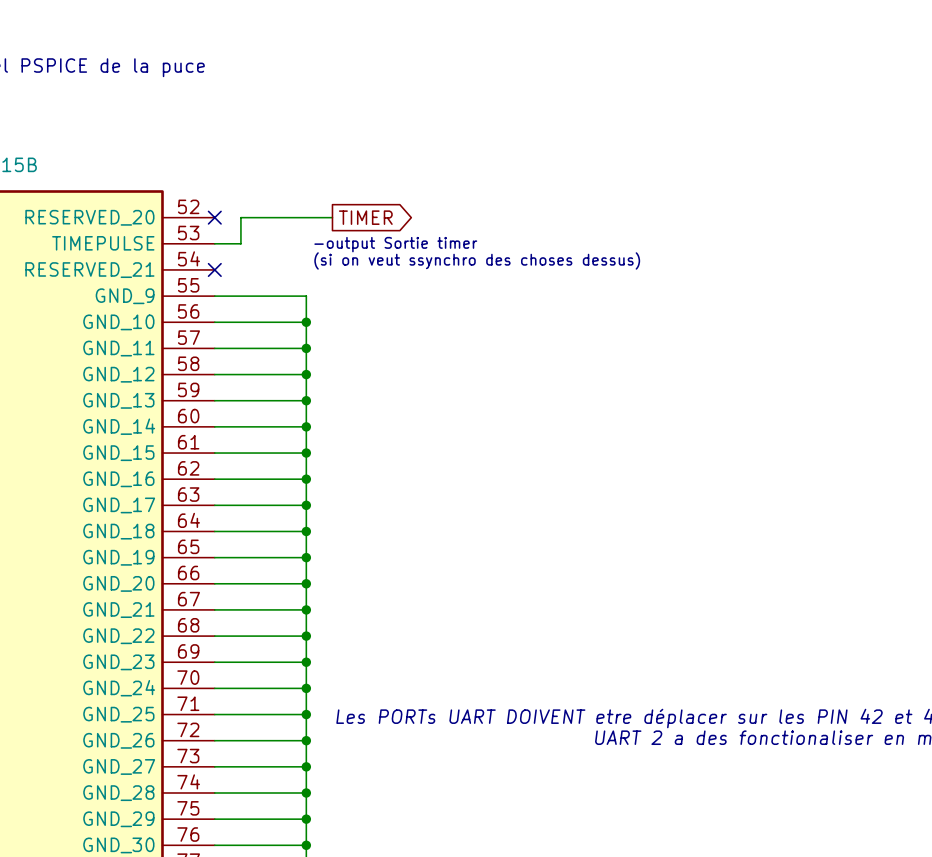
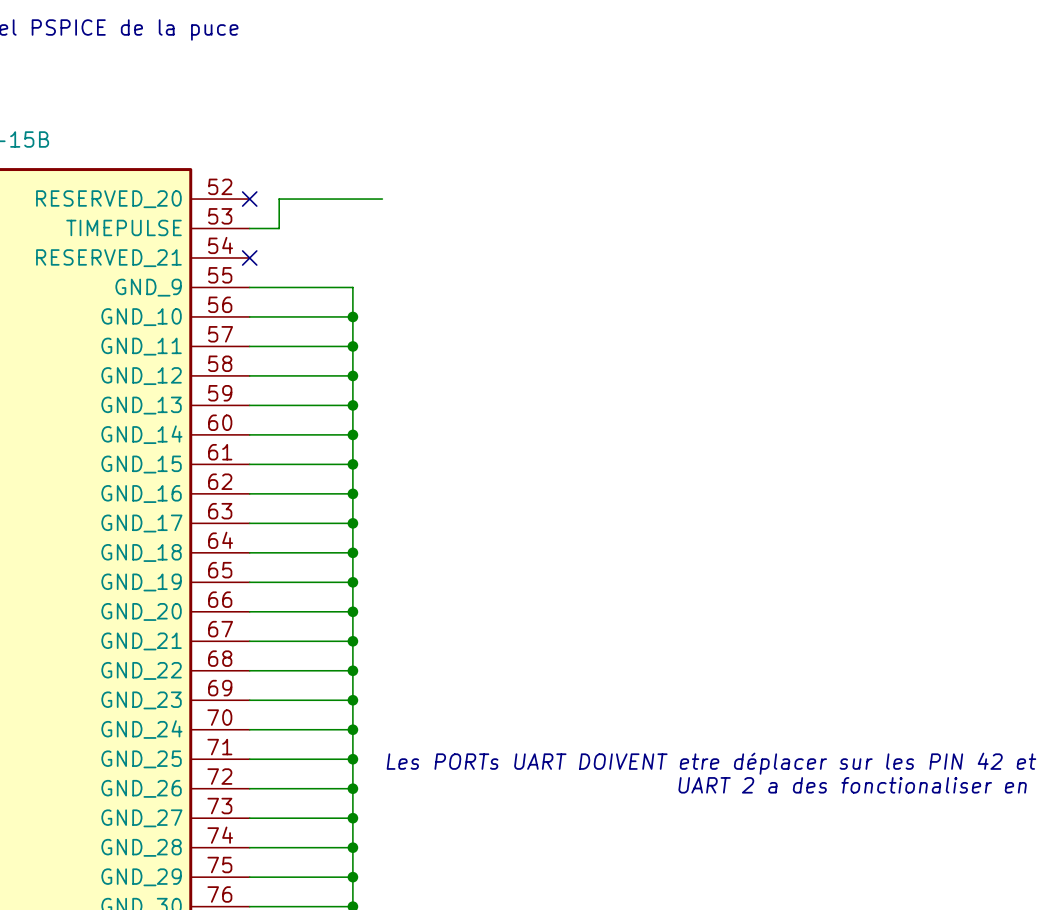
global label: TIMER (365, 217) -> none
text: -output Sortie timer (395, 244) -> none
text: (si on veut ssynchro des choses dessus) (477, 260) -> none

